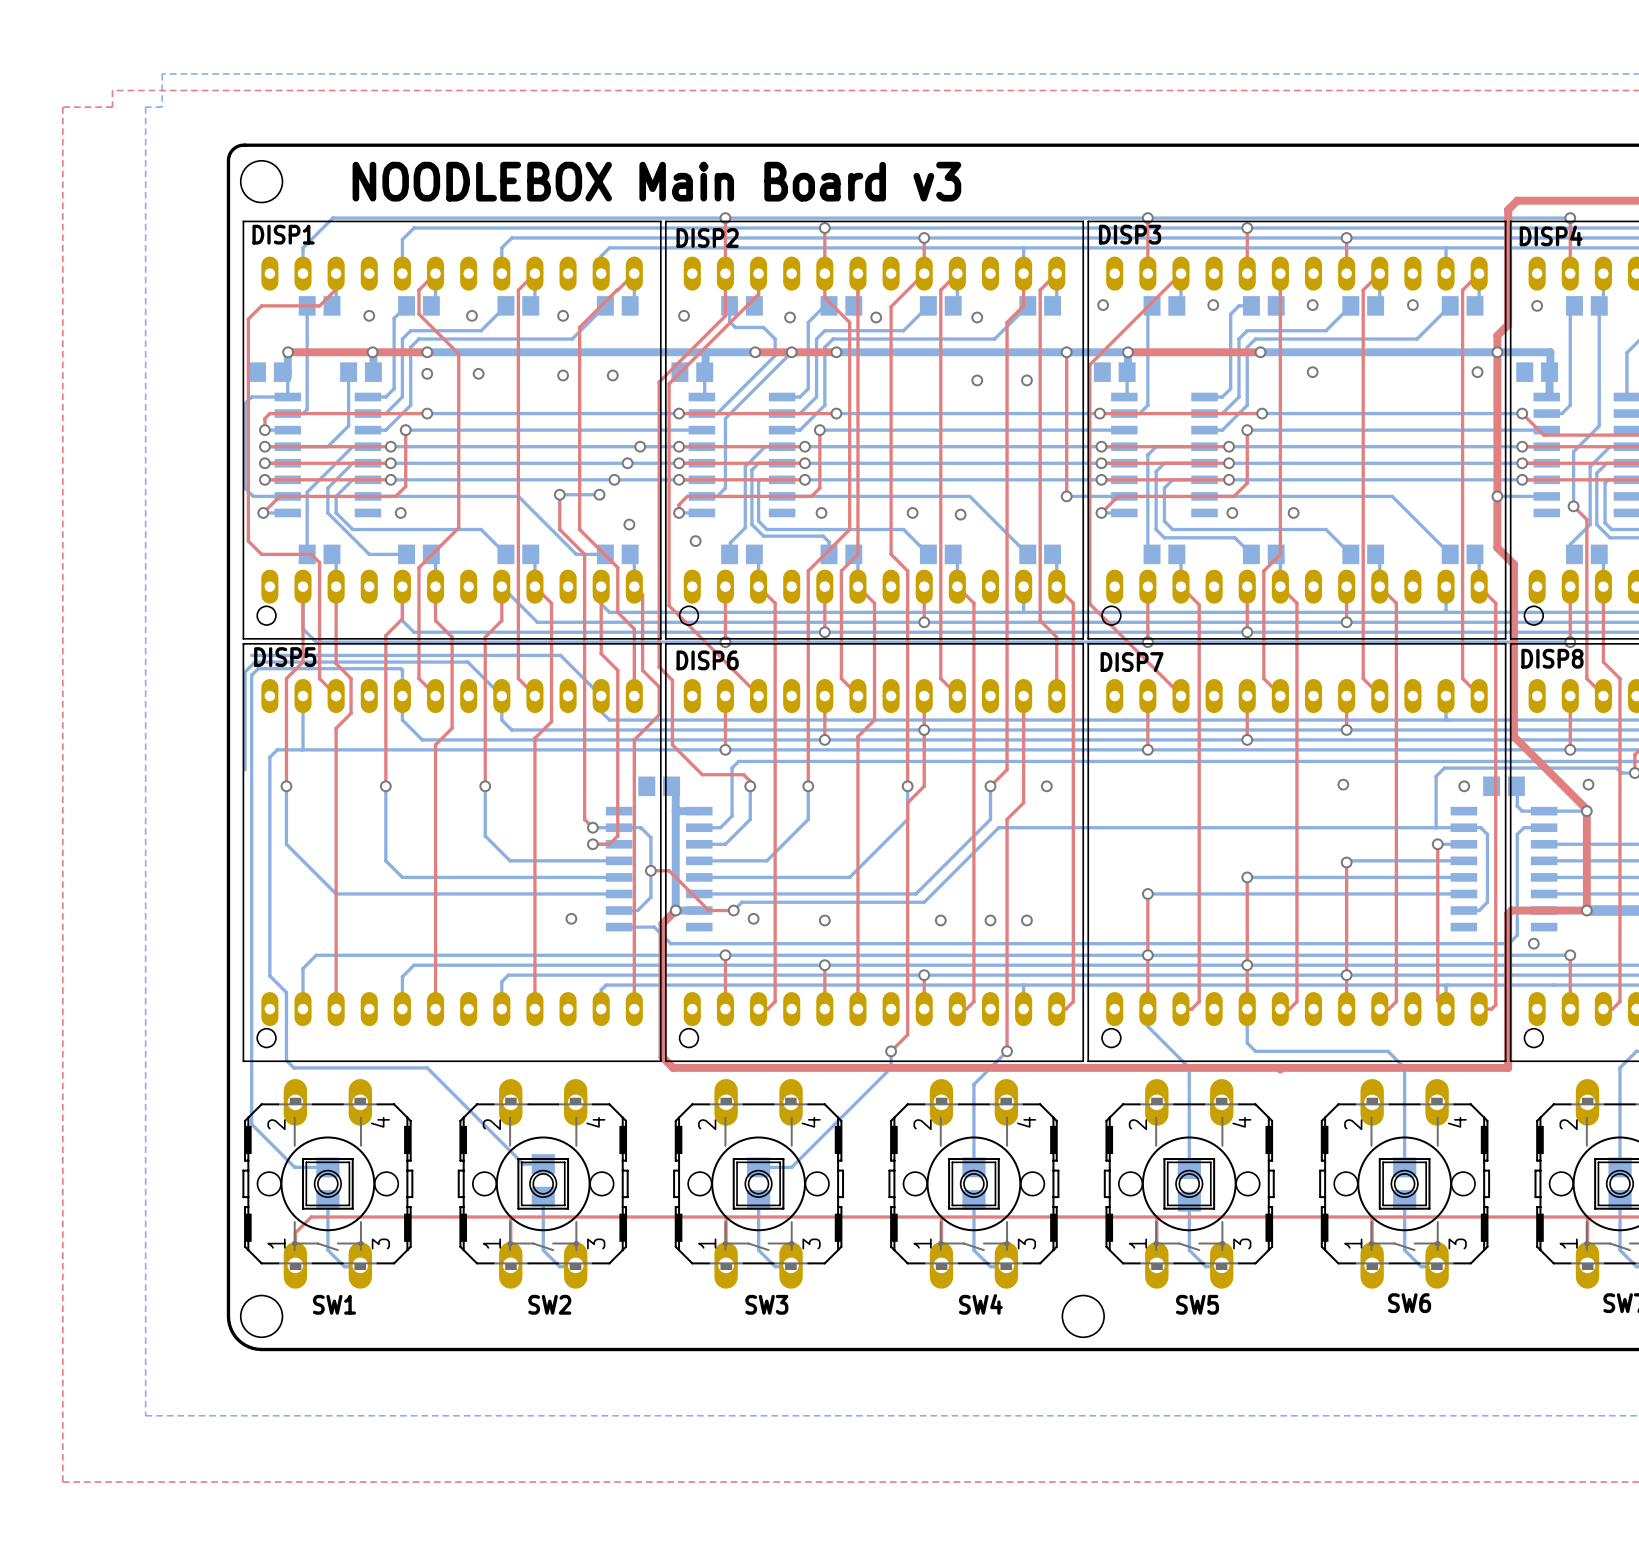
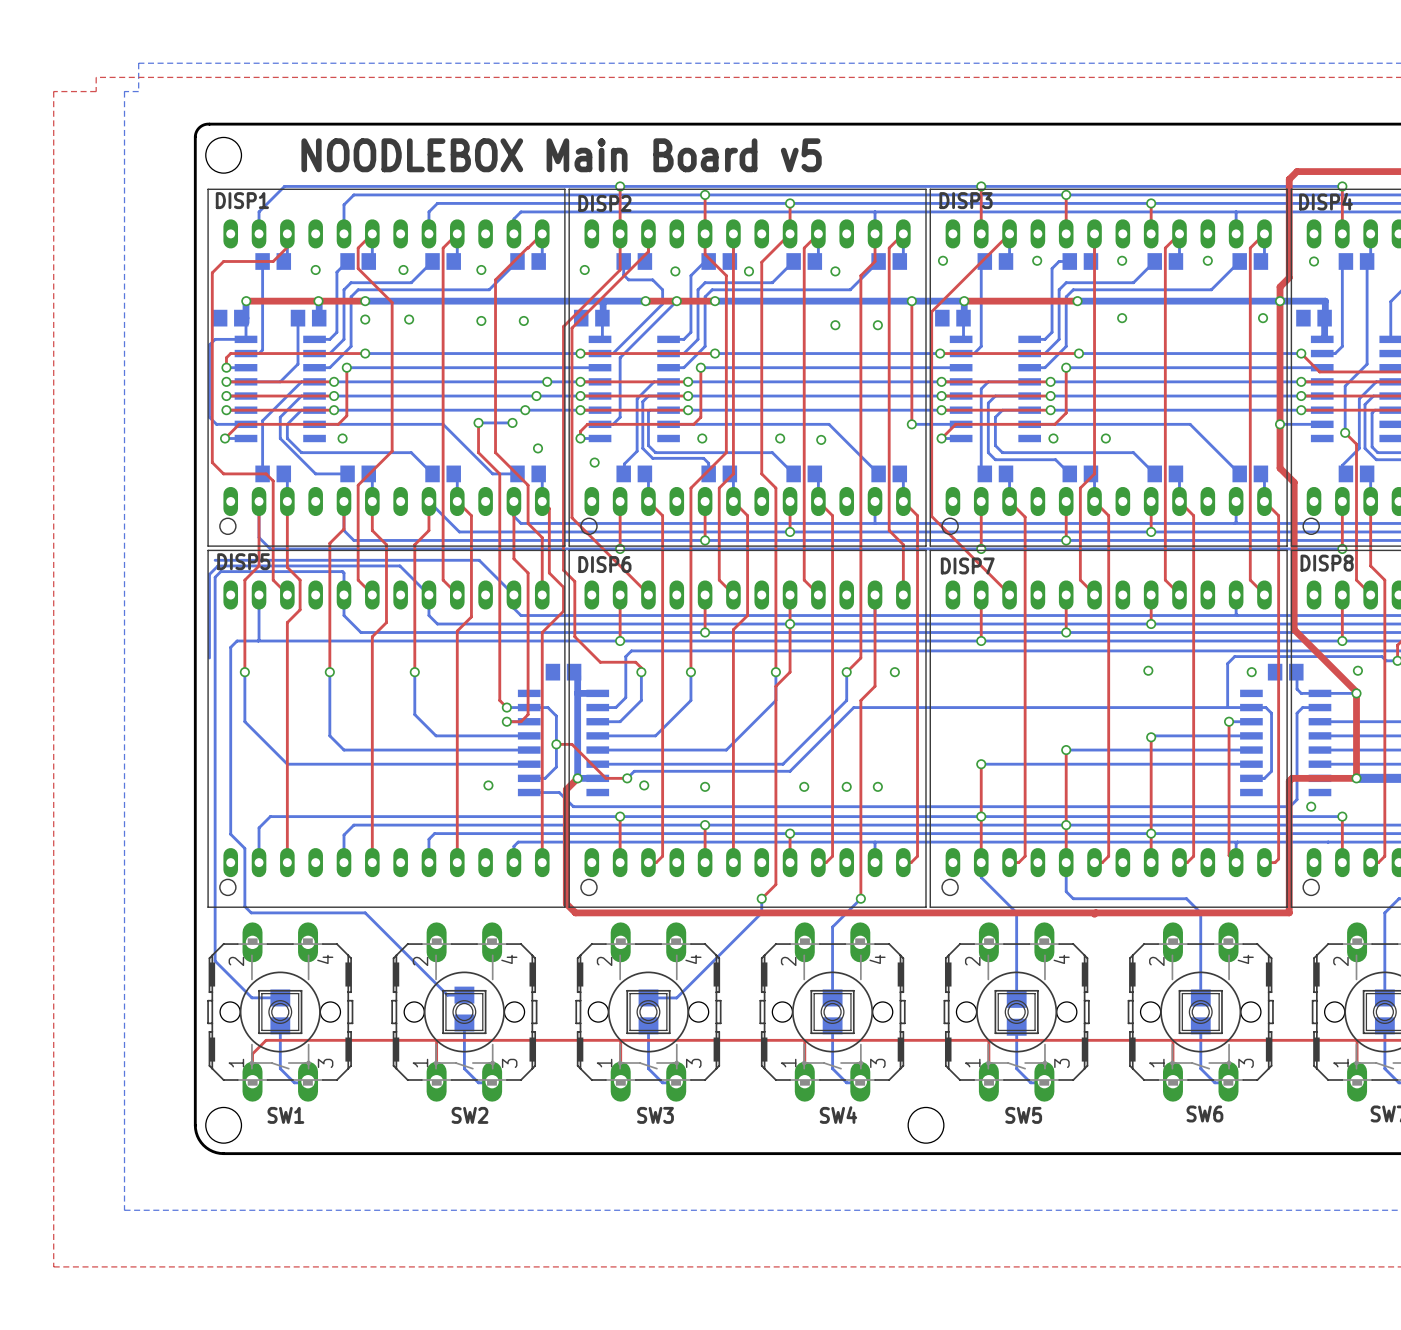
text: NOODLEBOX Main Board v3 (656, 181) -> NOODLEBOX Main Board v5 (561, 155)

